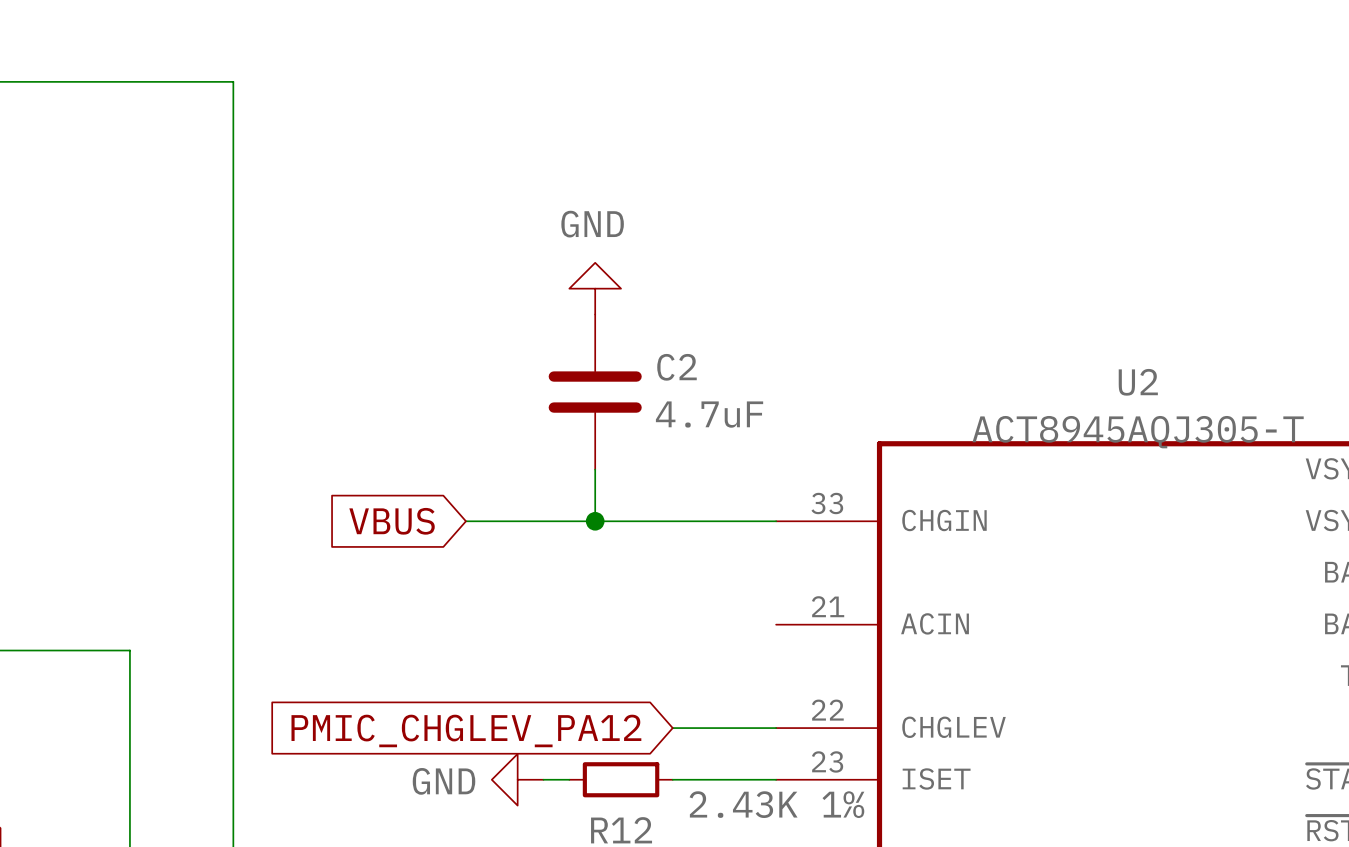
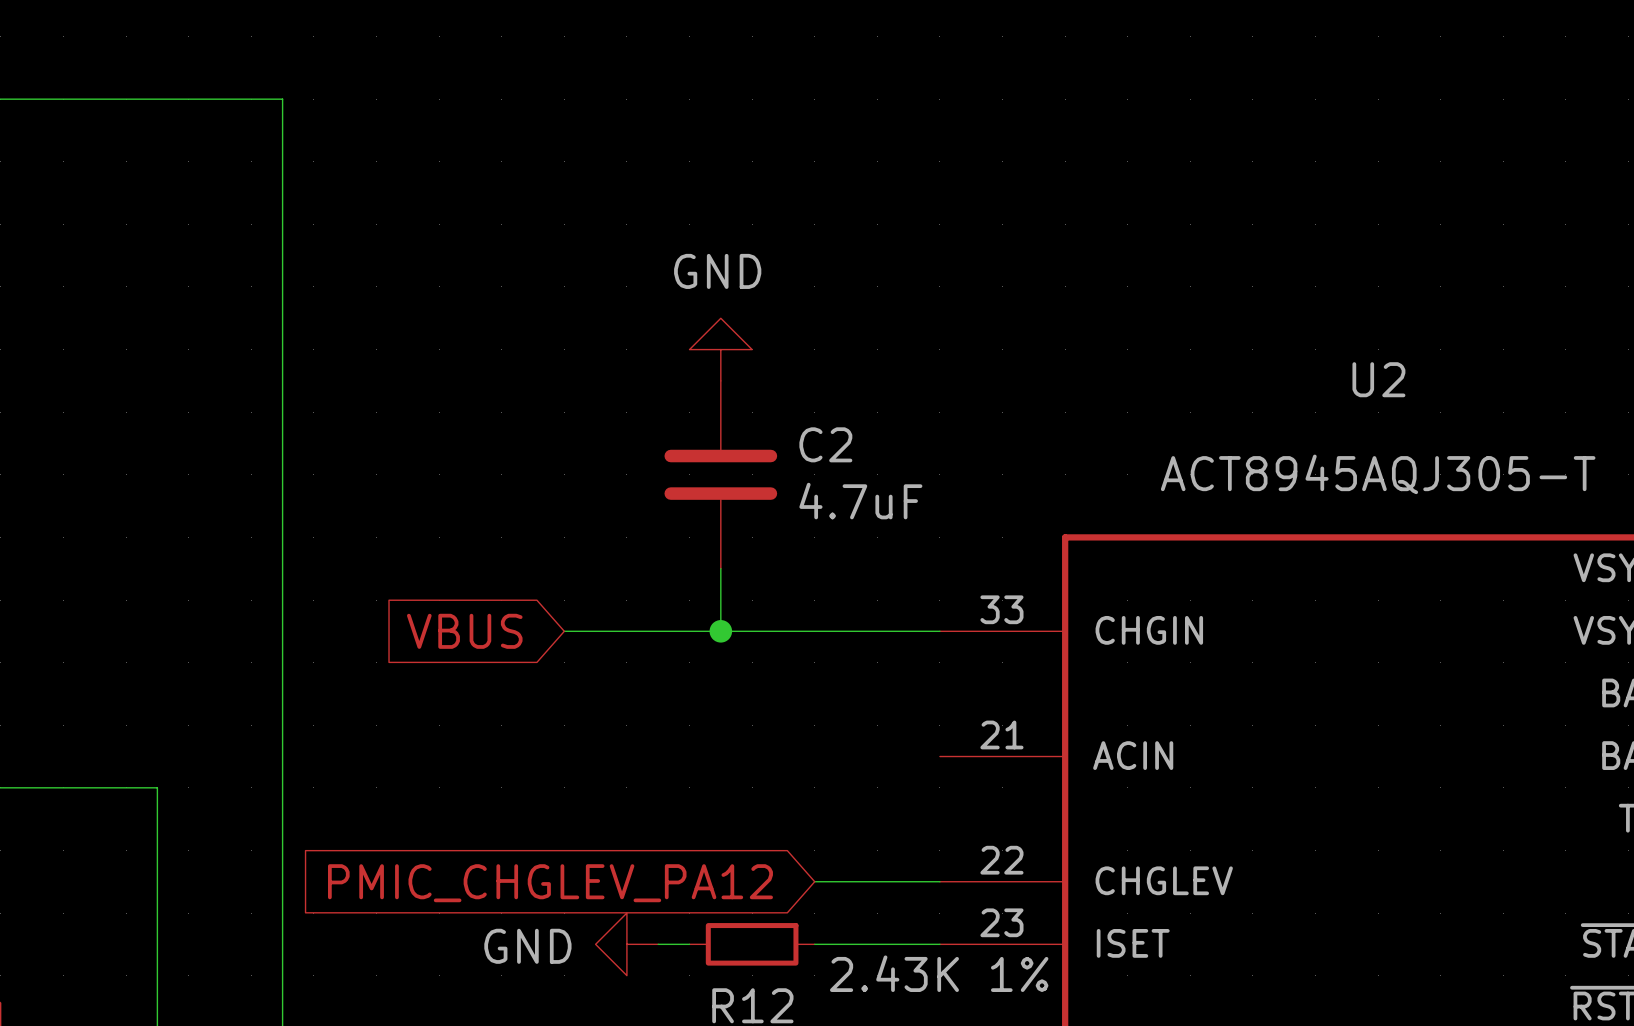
U2 name position: U2 (1138, 382) -> U2 (1378, 379)
U2 value position: ACT8945AQJ305-T (1138, 432) -> ACT8945AQJ305-T (1378, 474)

